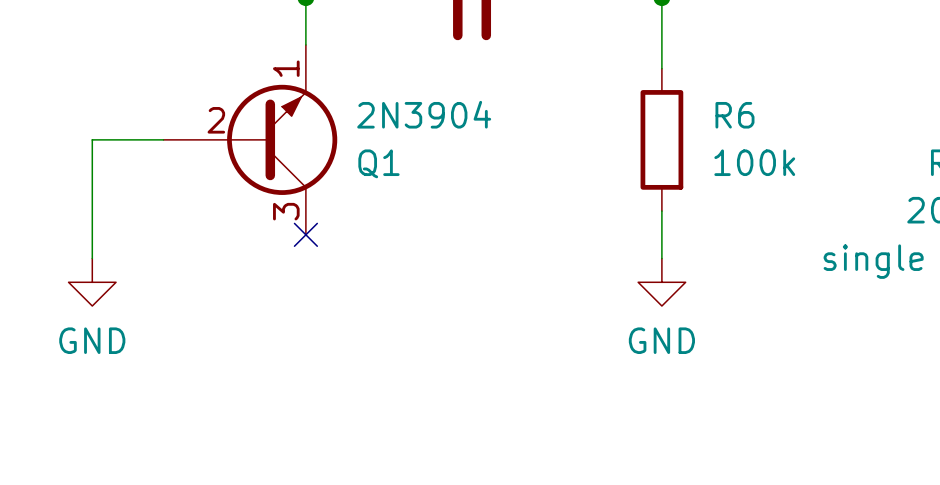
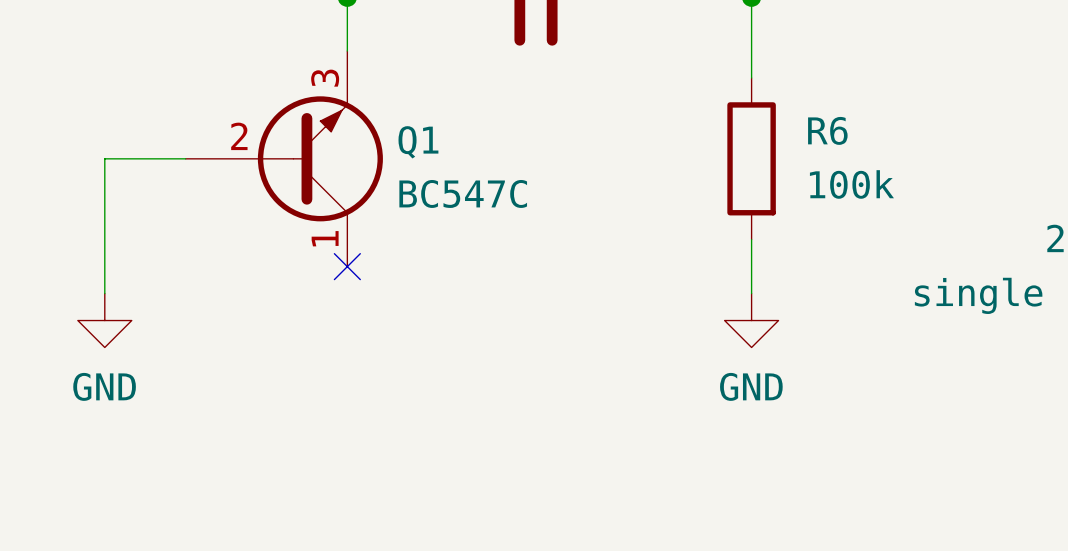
Q1 symbol: [163, 44, 338, 235] -> [185, 51, 383, 267]
Q1 value: 2N3904 (424, 114) -> BC547C (463, 193)
Q1 name position: Q1 (378, 163) -> Q1 (418, 142)

